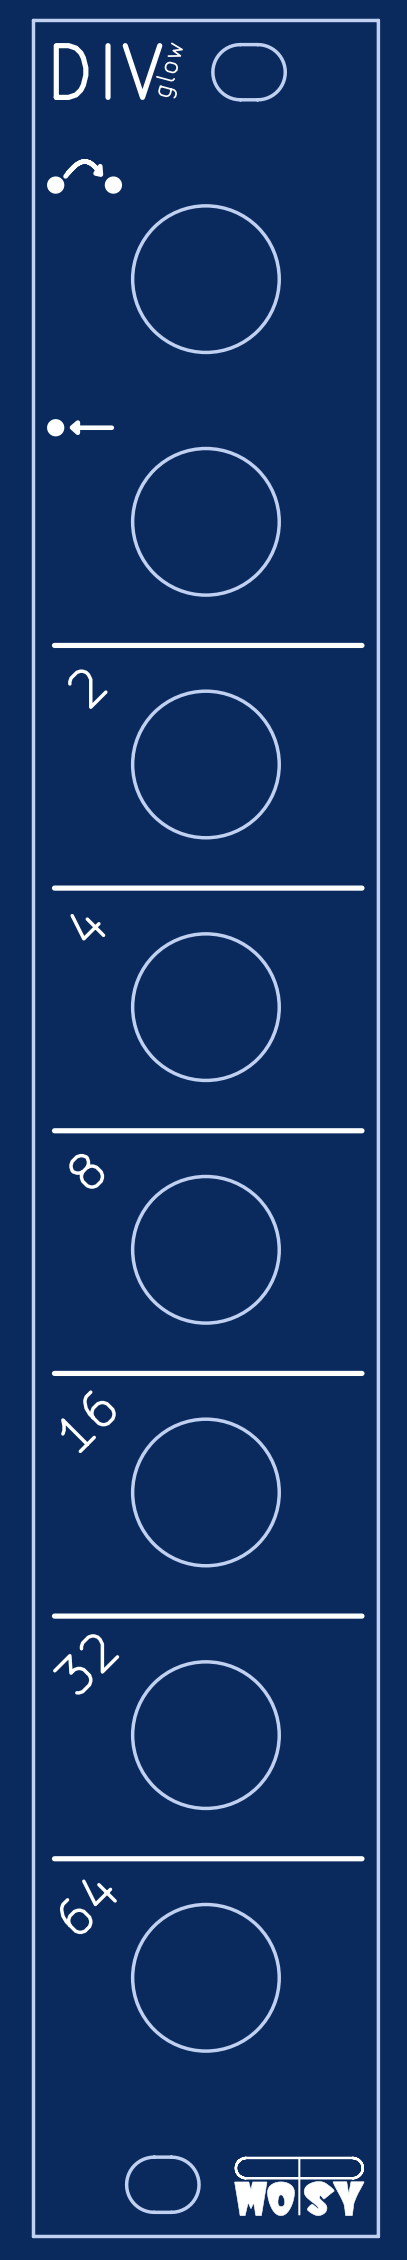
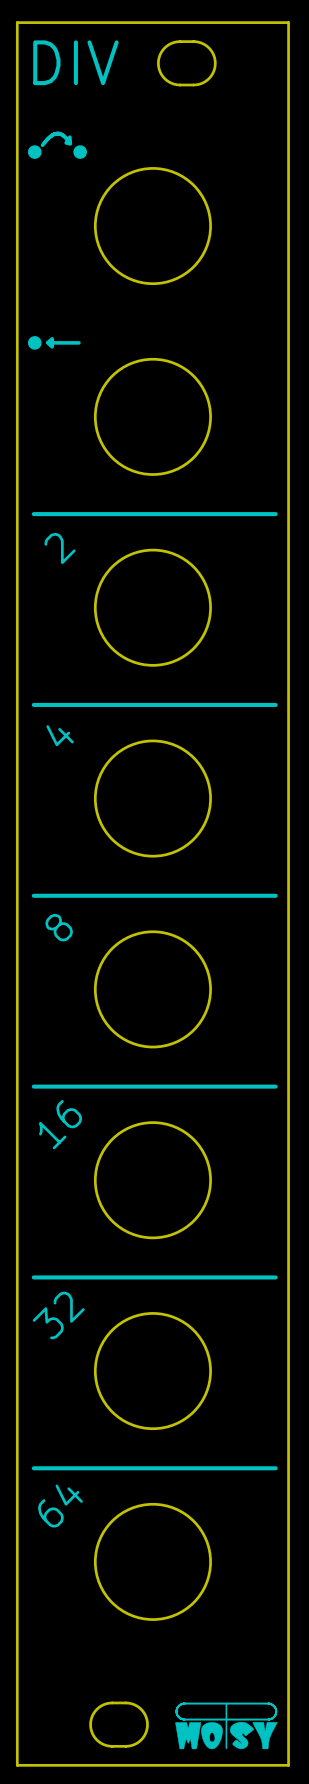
text: glow (169, 70) -> none

